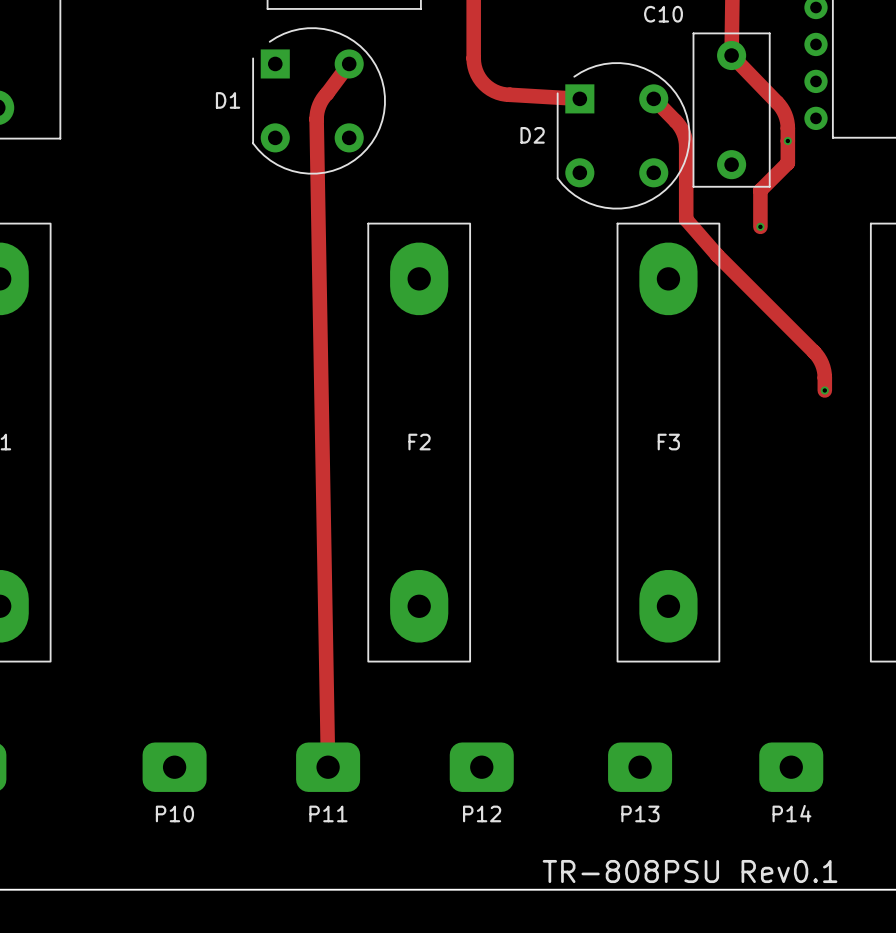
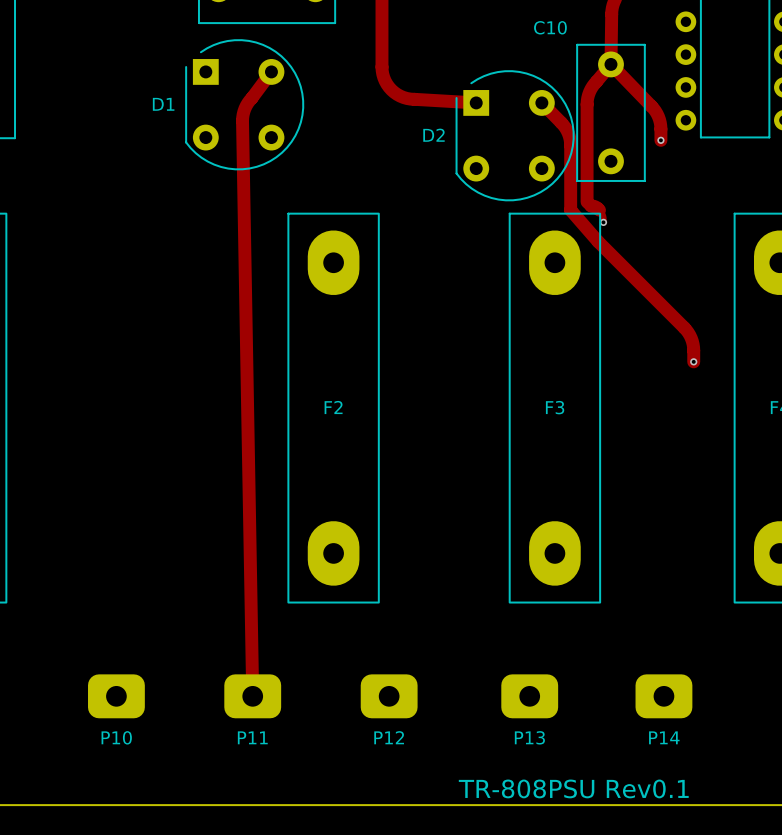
track: none -> (610, 64) (592, 86) (587, 101) (587, 201) (591, 205)
track: (787, 141) (787, 163) (760, 190) (760, 226) -> none
track: none -> (591, 205) (600, 211) (603, 222)
via position: (760, 226) -> (603, 222)

